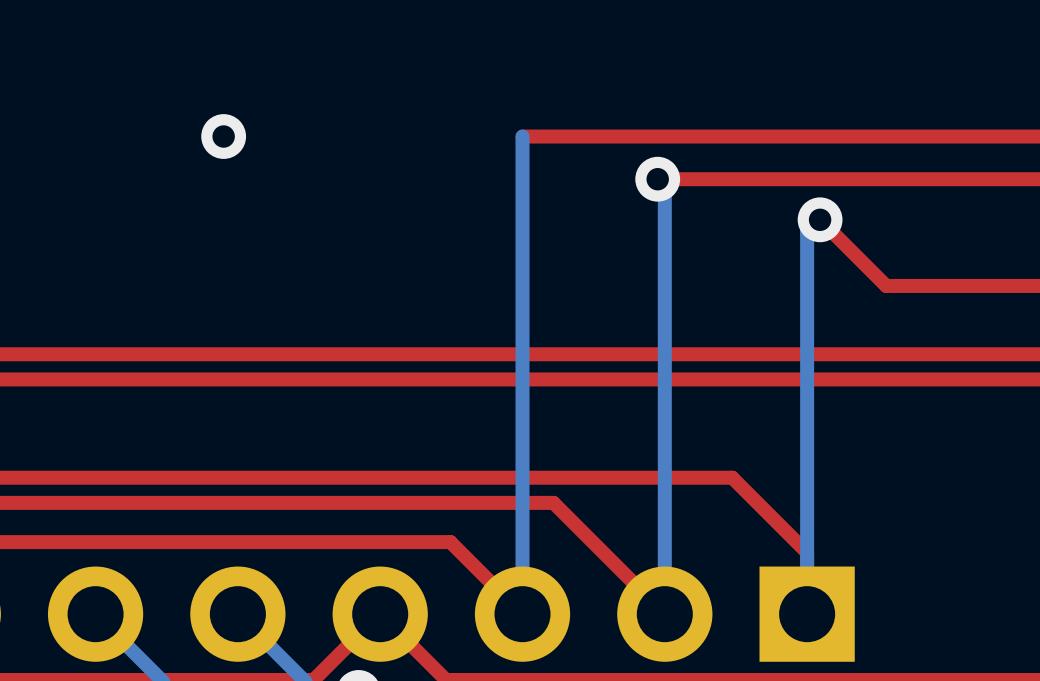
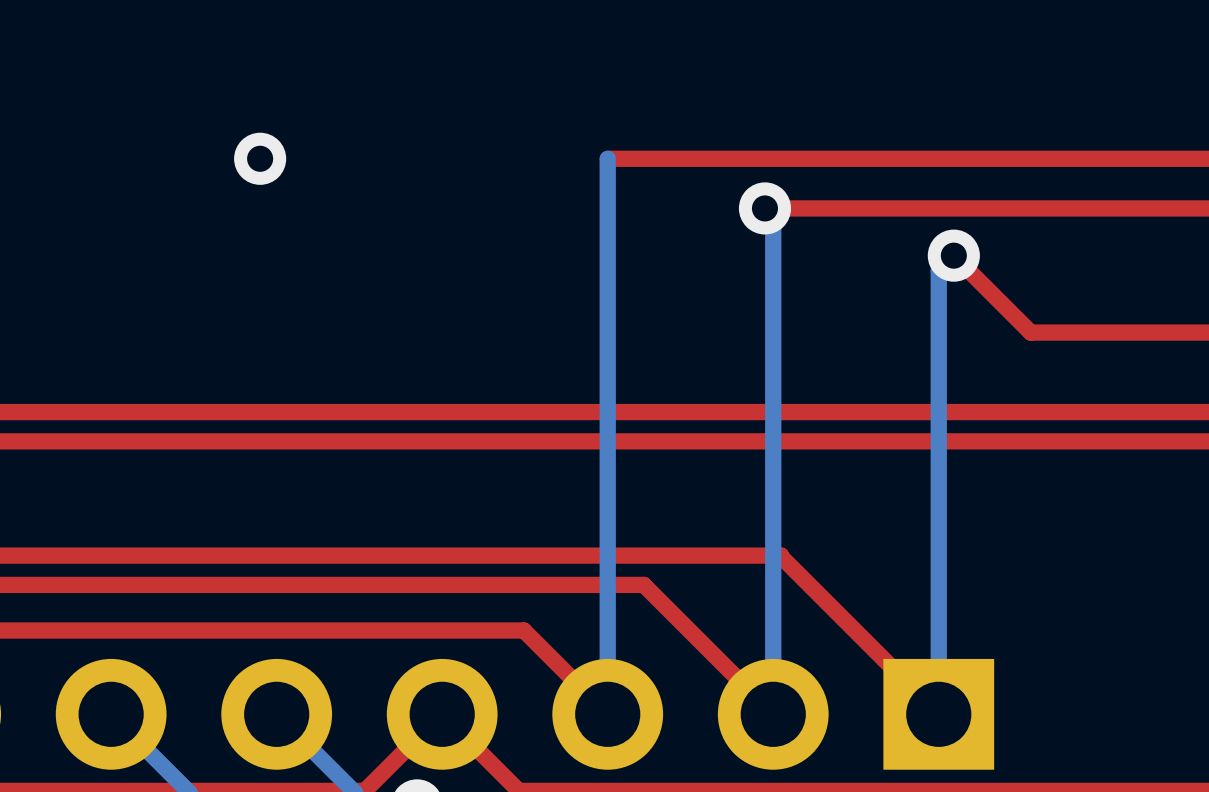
top track: (671, 477) (732, 477) (807, 552) (807, 614) -> (781, 556) (938, 714)

